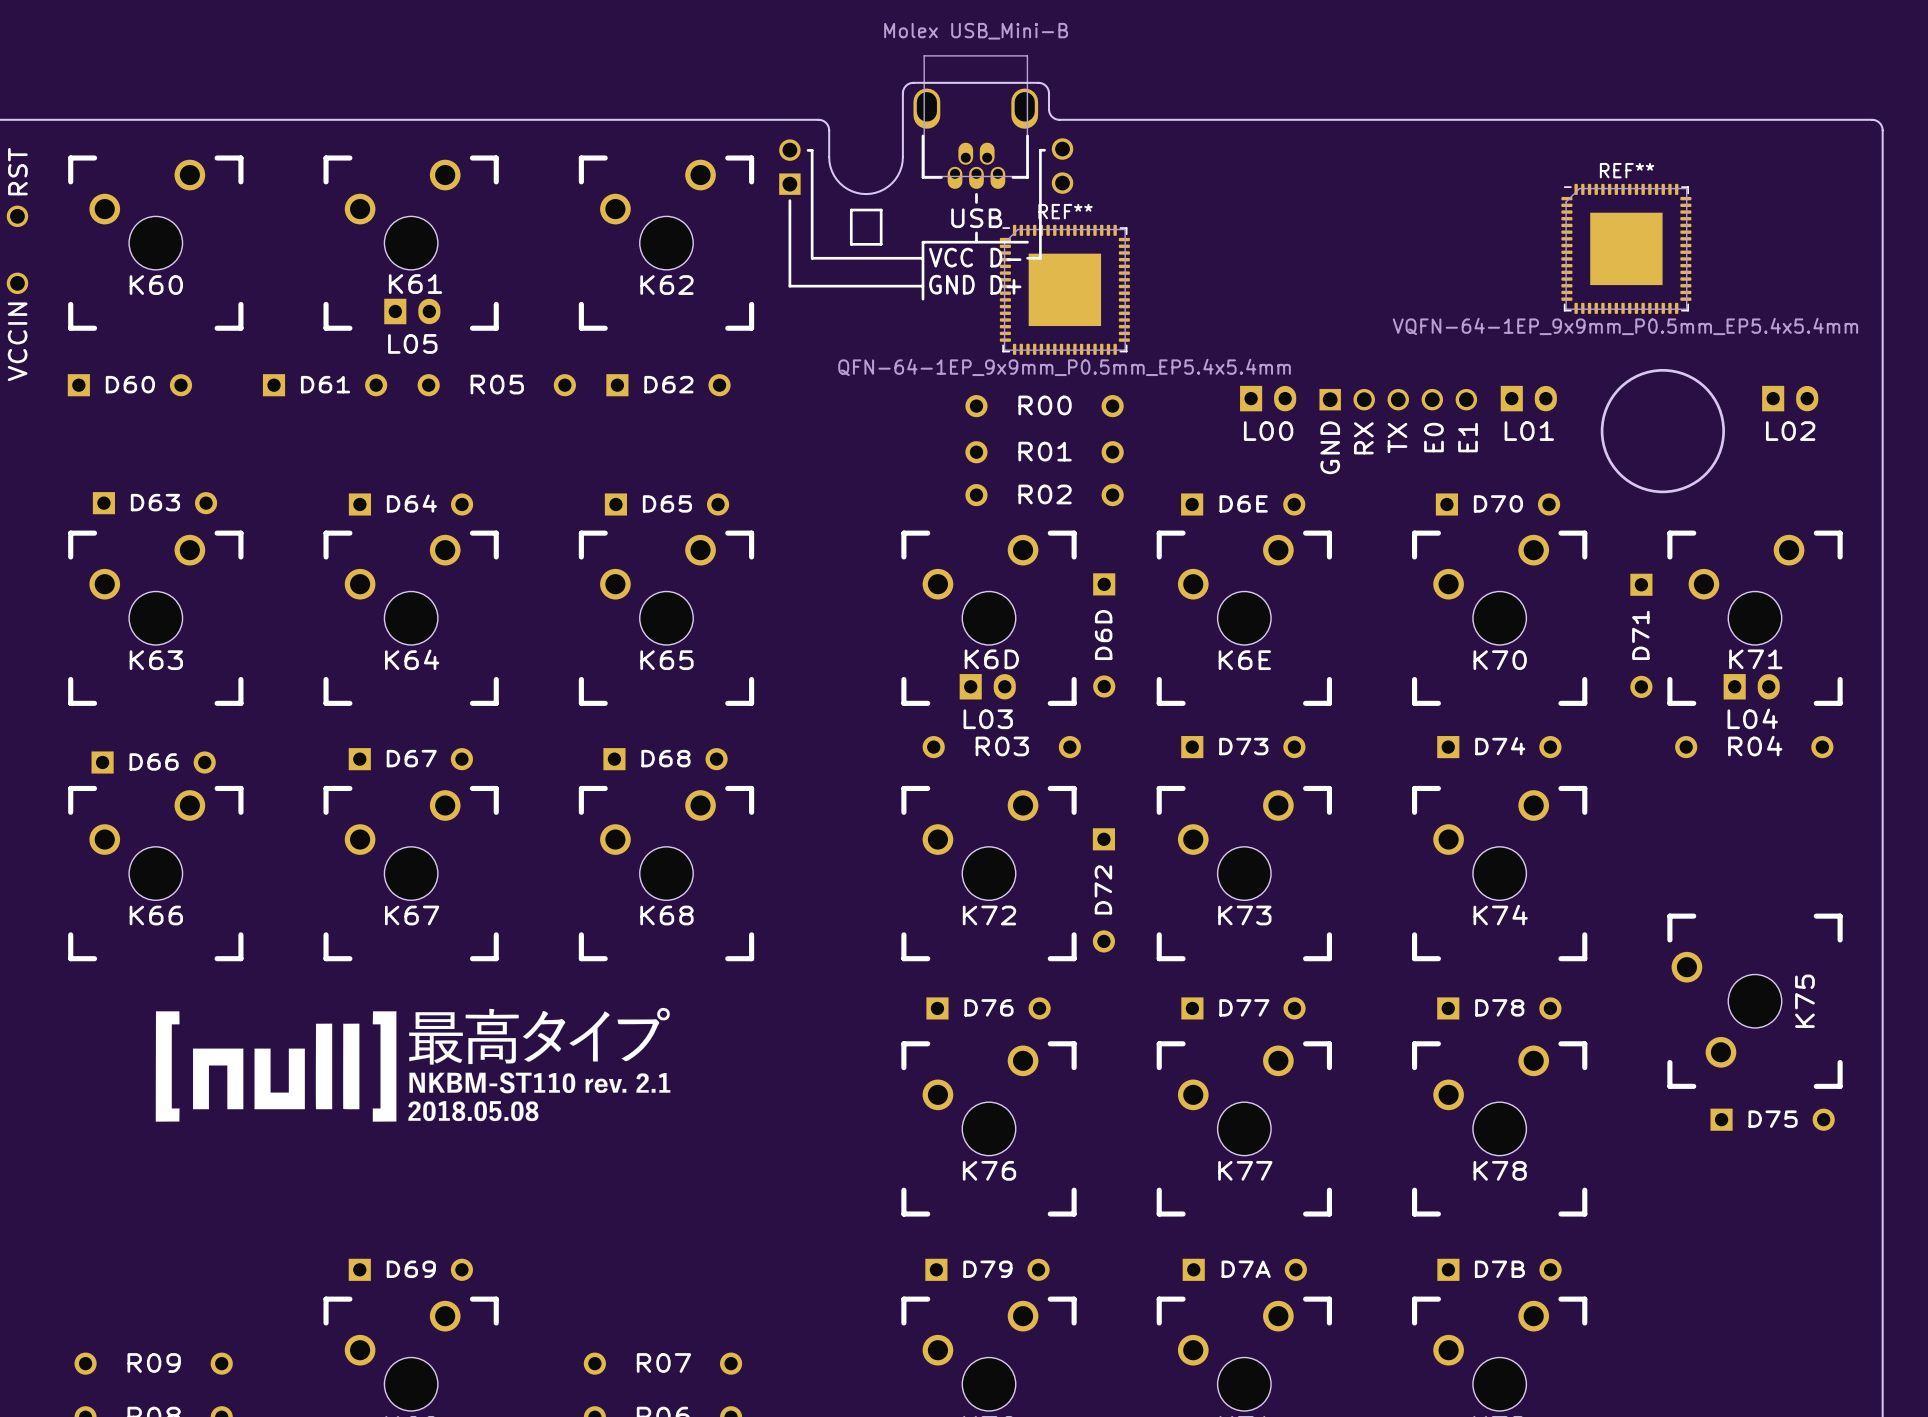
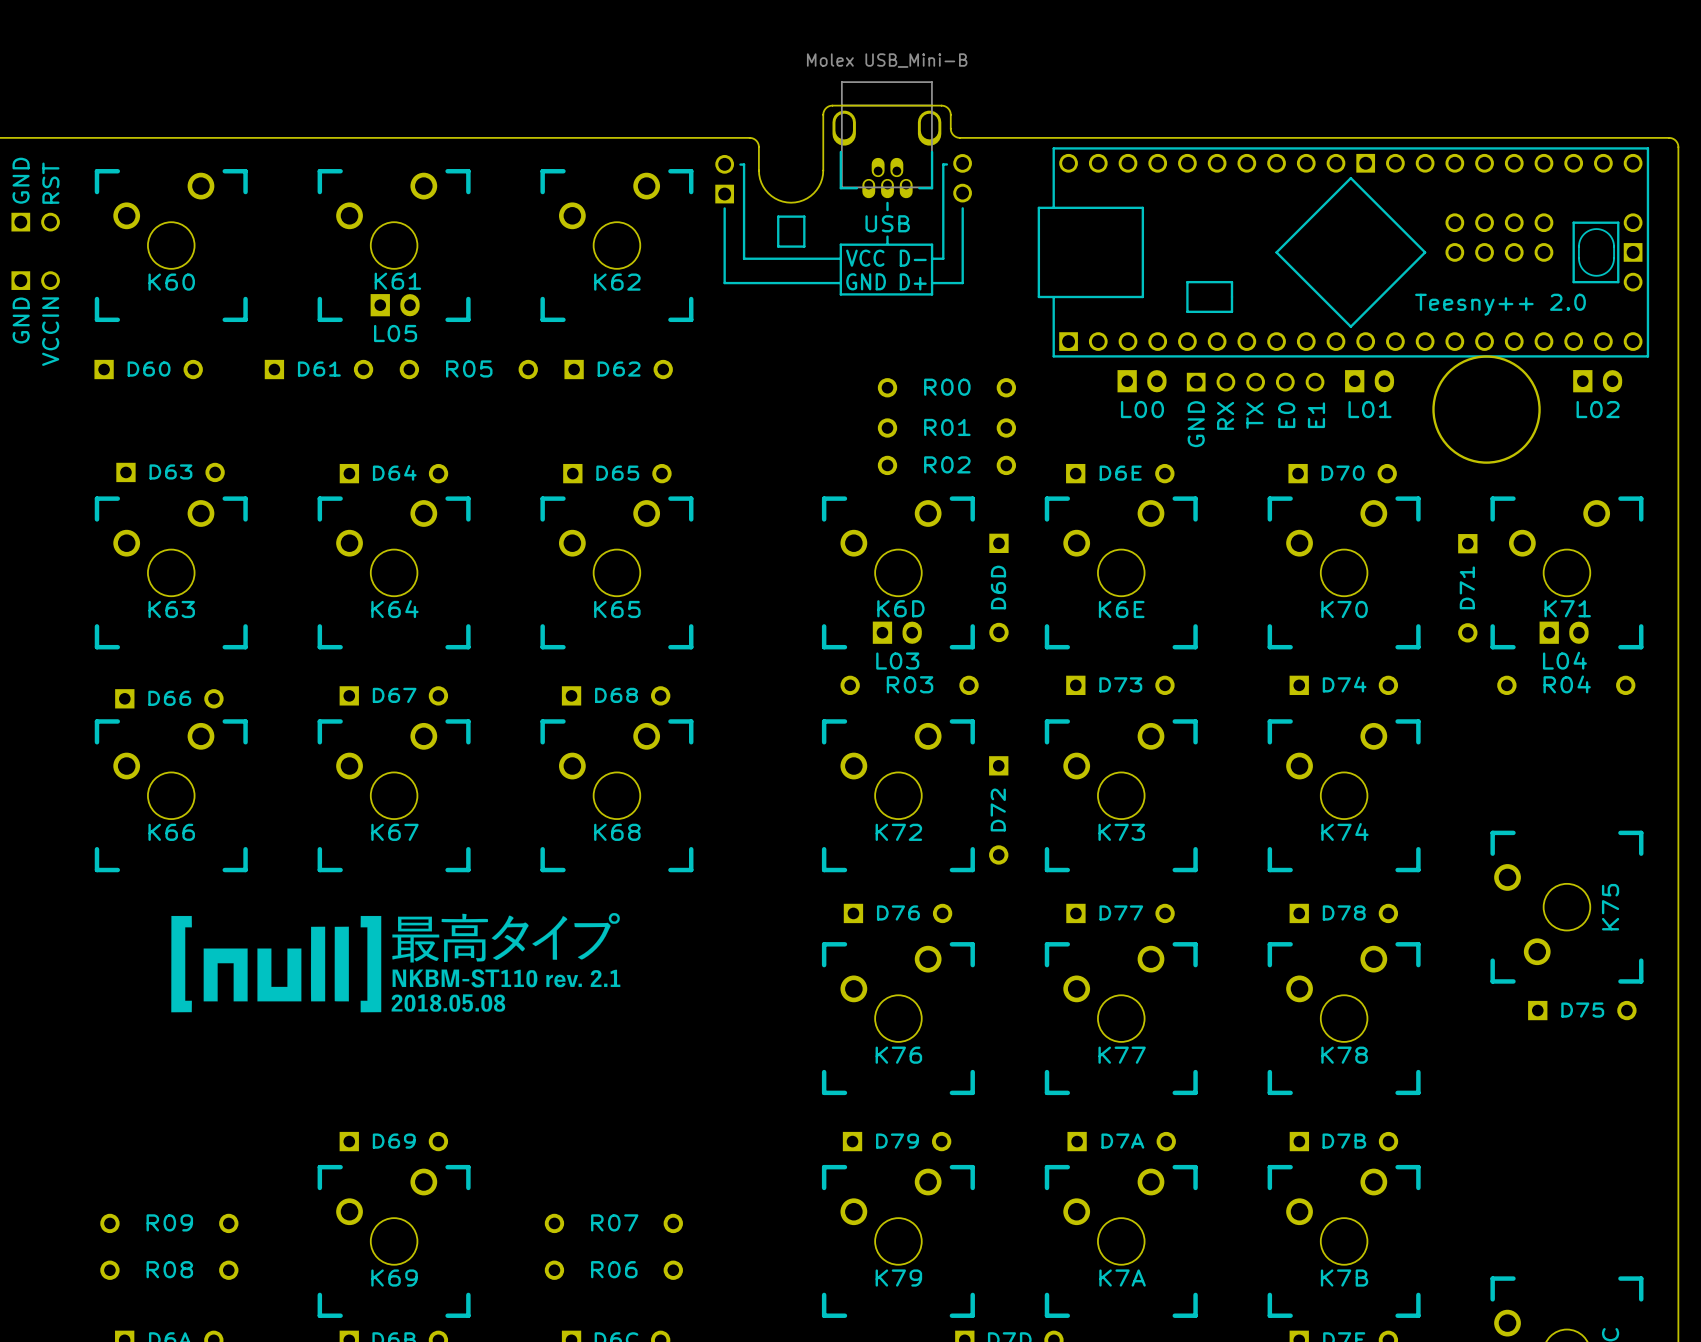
line: none -> (962, 208) (962, 283) (932, 283)
line: none -> (932, 244) (932, 294) (840, 294)
REF**: VQFN-64-1EP_9x9mm_P0.5mm_EP5.4x5.4mm (1626, 248) -> none
part: none -> Teesny++ 2.0 (1343, 252)
REF**: QFN-64-1EP_9x9mm_P0.5mm_EP5.4x5.4mm (1064, 289) -> none

